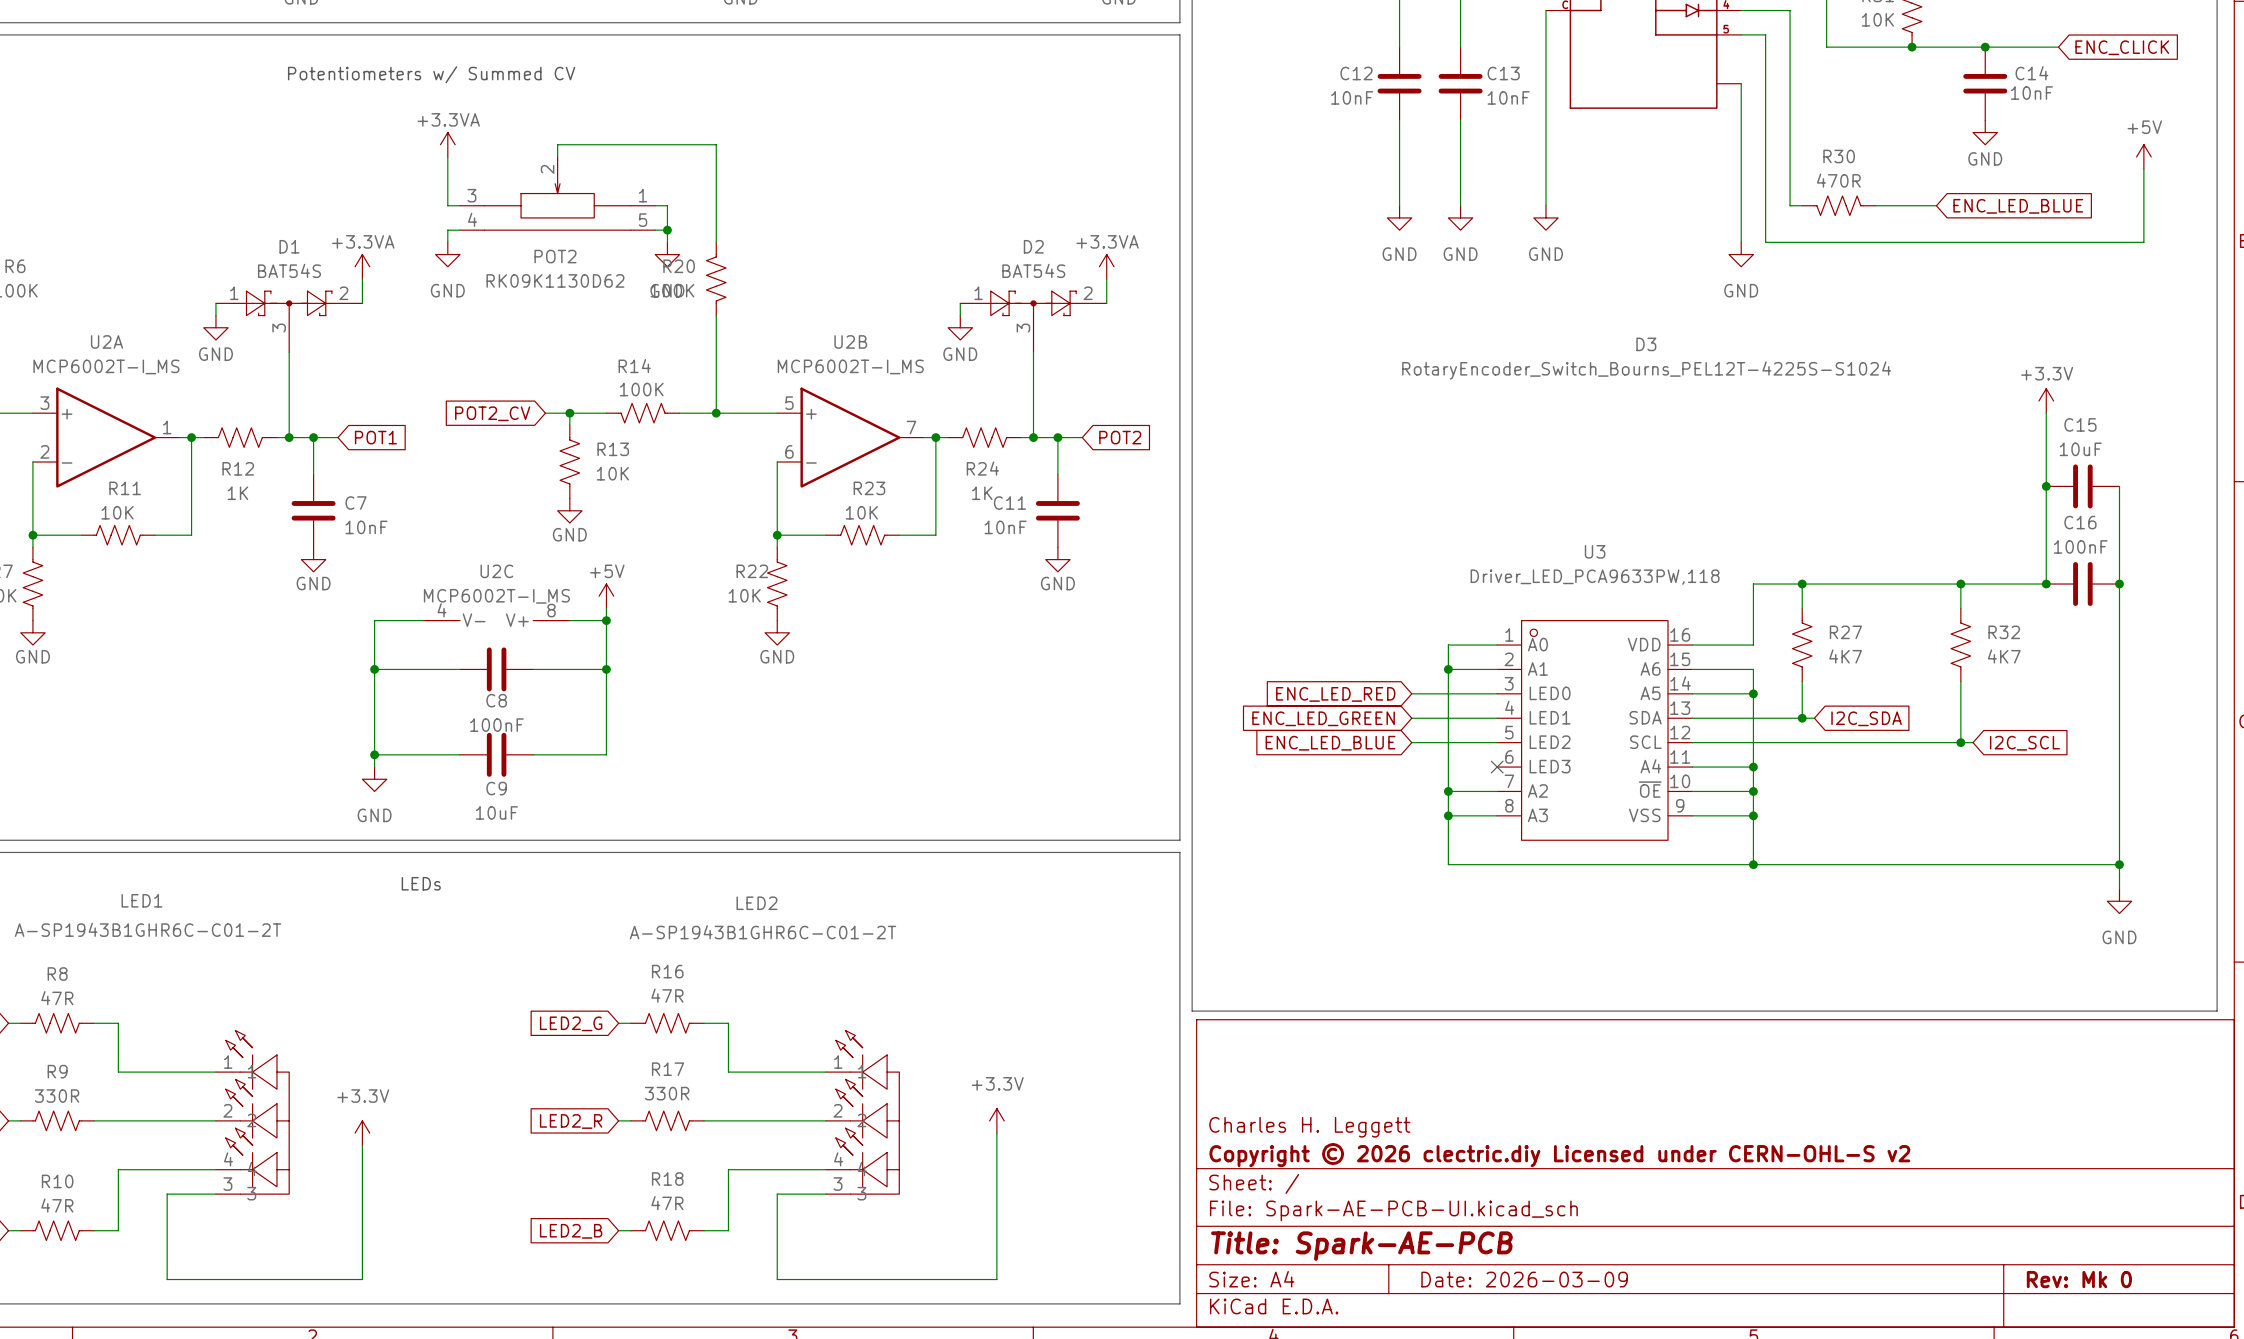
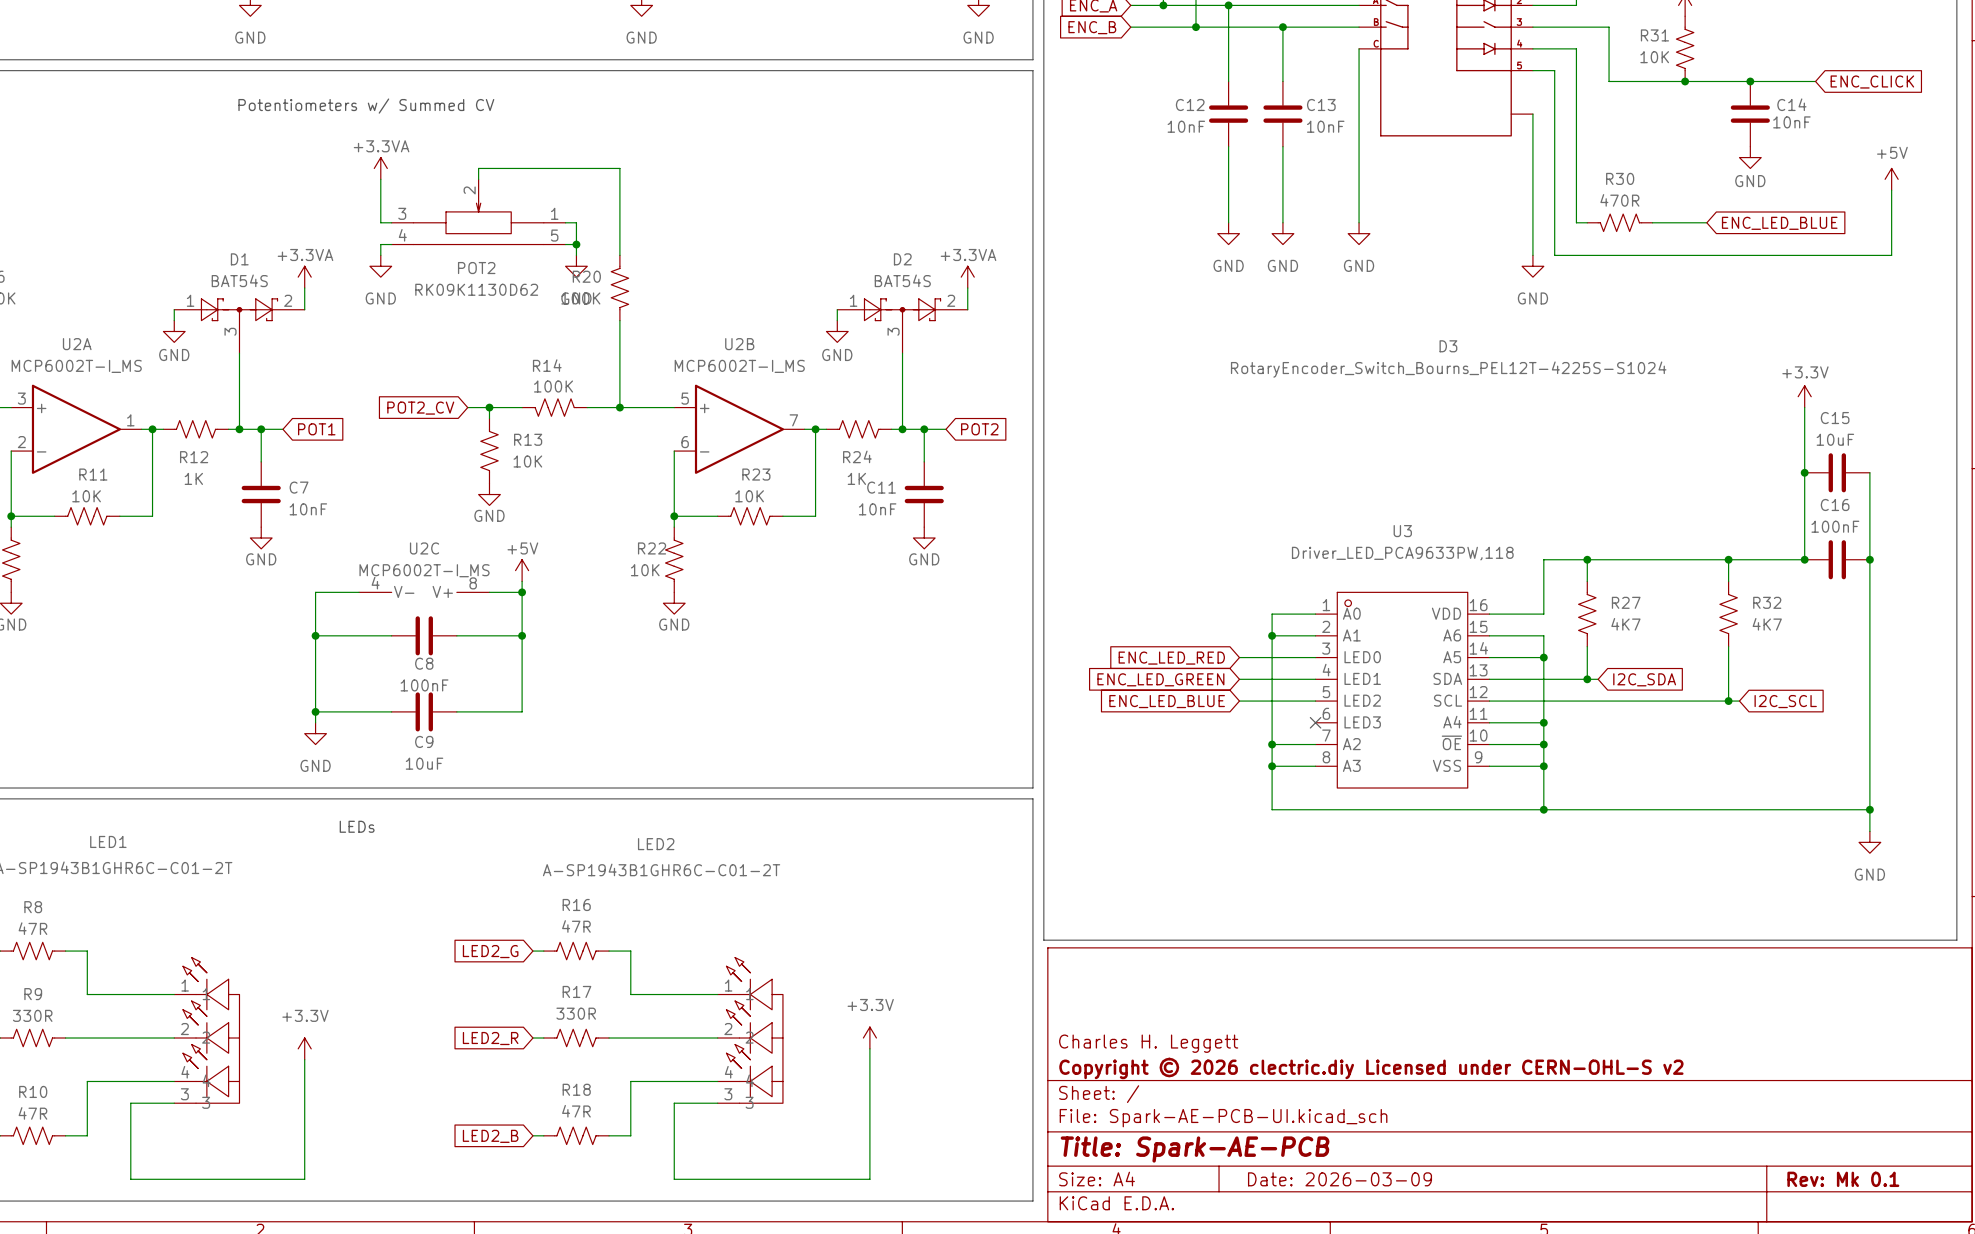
title block: Rev: Mk 0 (2079, 1279) -> Rev: Mk 0.1 (1843, 1179)

